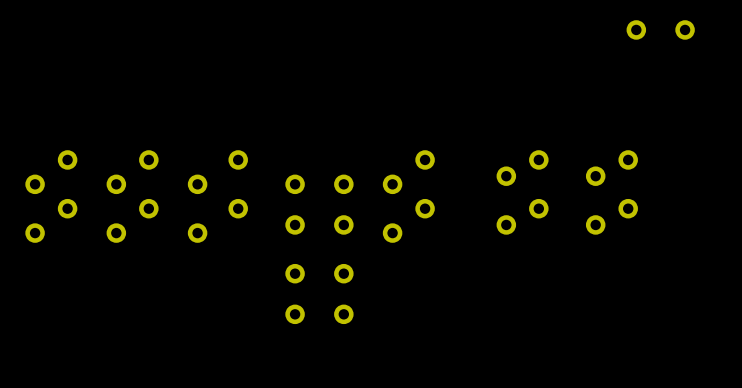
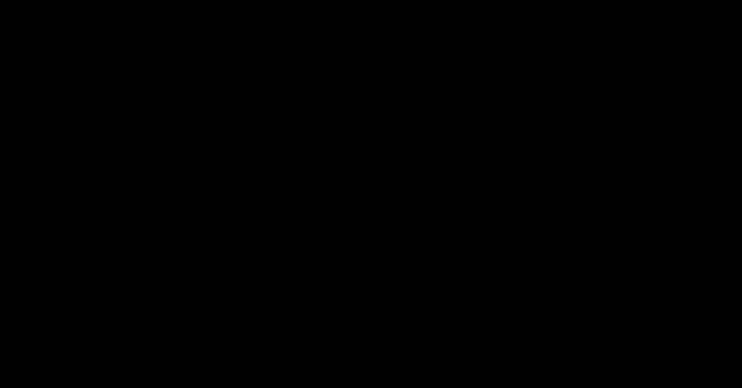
part: (660, 29) -> none
part: (67, 184) -> none
part: (148, 184) -> none
part: (238, 184) -> none
part: (319, 184) -> none
part: (425, 184) -> none
part: (538, 184) -> none
part: (628, 184) -> none
part: (506, 200) -> none
part: (595, 200) -> none
part: (35, 208) -> none
part: (116, 208) -> none
part: (197, 208) -> none
part: (392, 208) -> none
part: (319, 224) -> none
part: (319, 273) -> none
part: (319, 314) -> none

